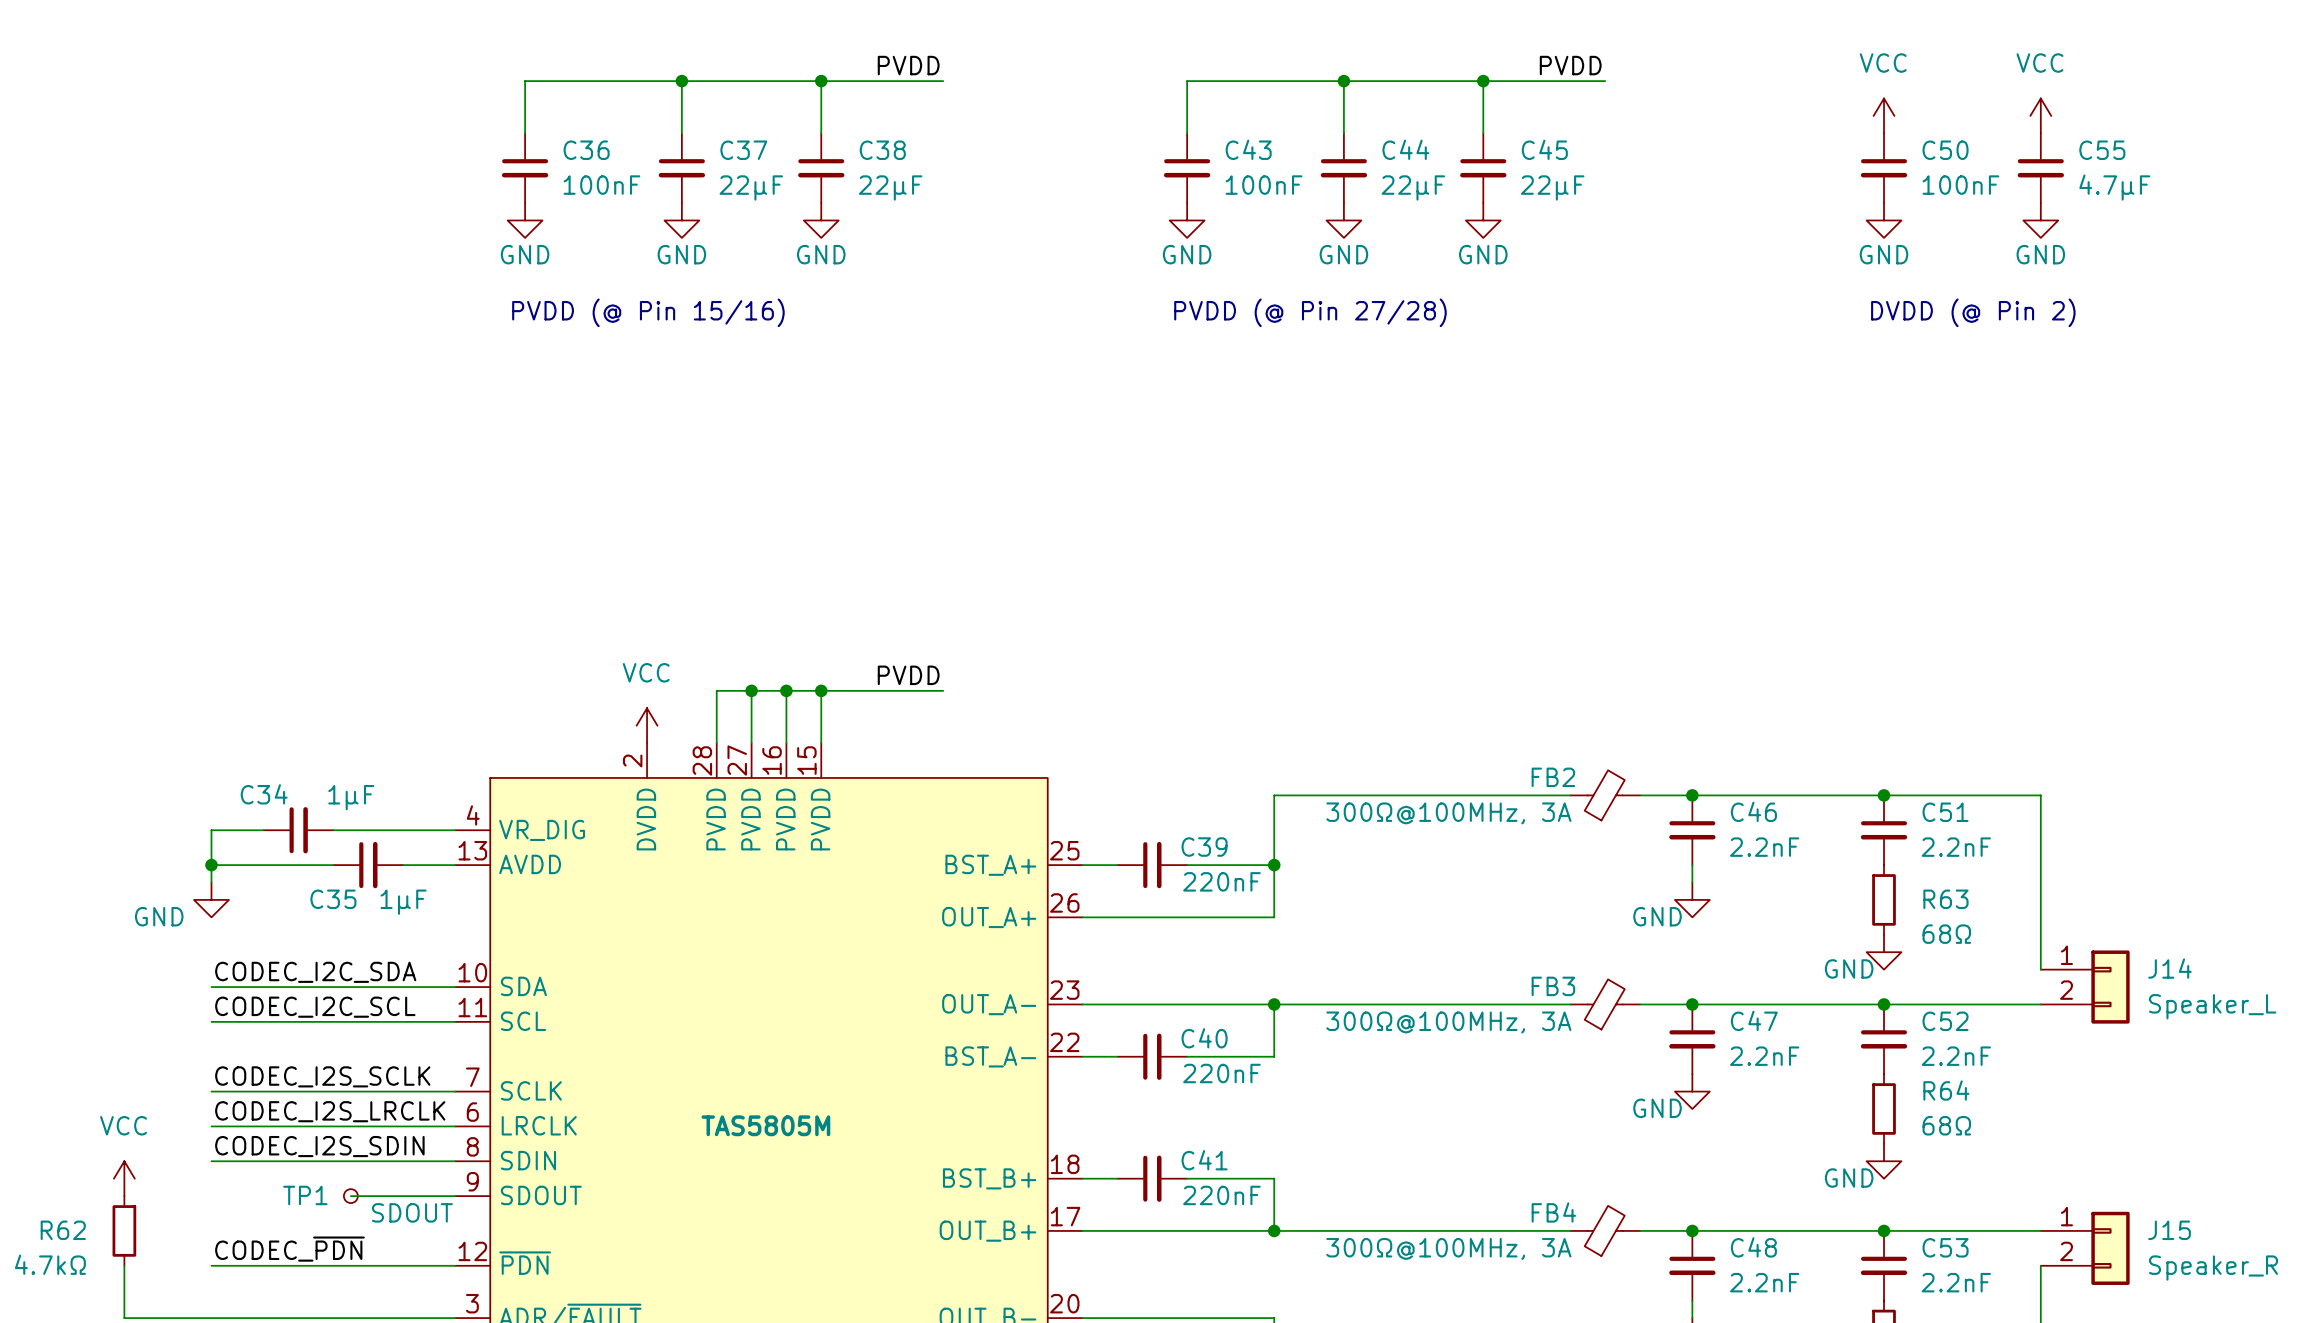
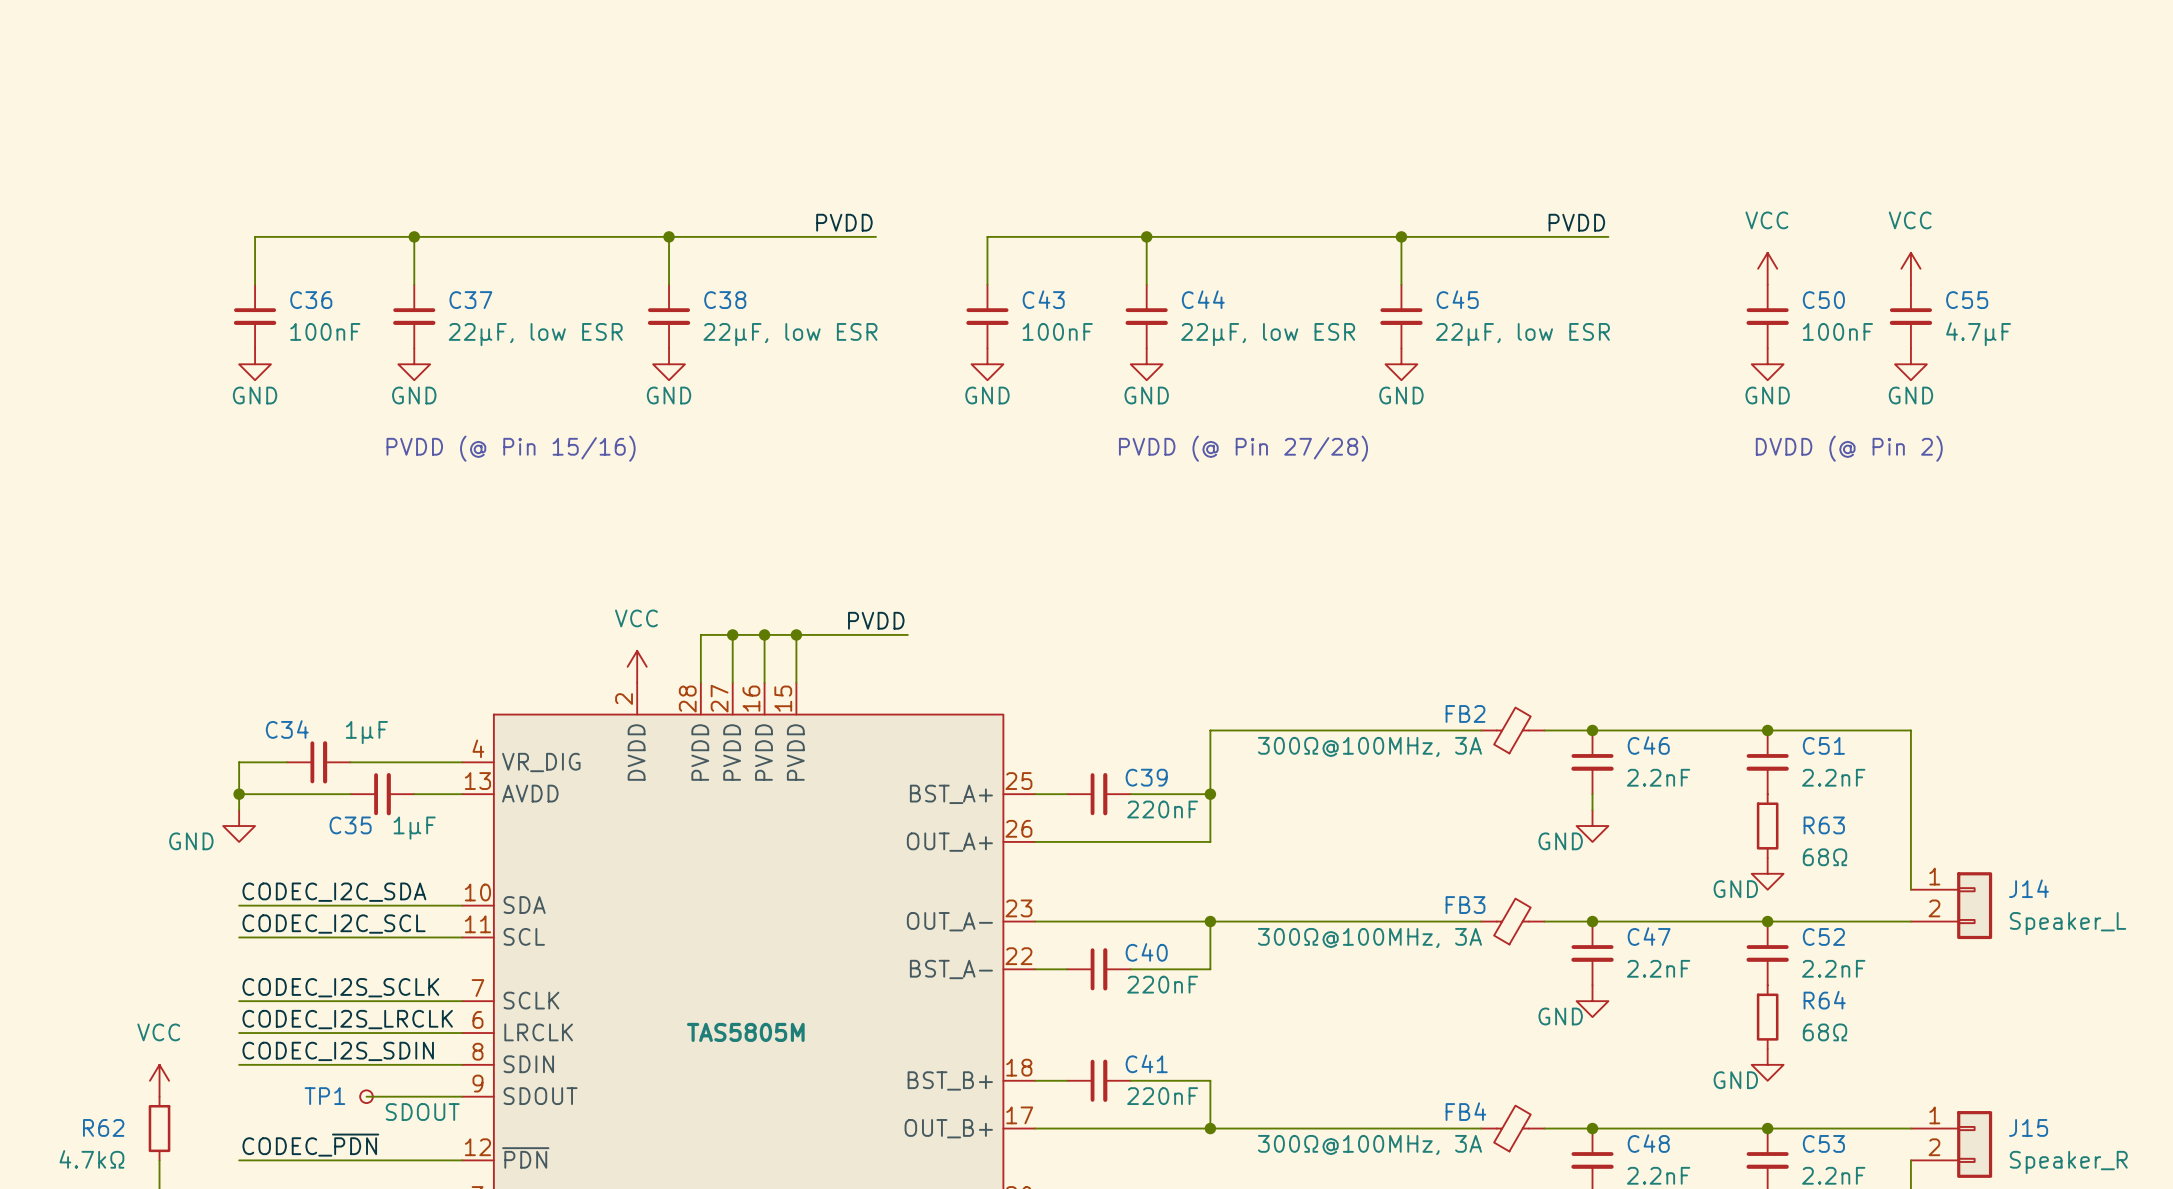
label position: PVDD (908, 65) -> PVDD (844, 222)
label position: PVDD (1570, 65) -> PVDD (1576, 222)
wire: (681, 81) (681, 133) -> (669, 236) (669, 284)
junction: (681, 81) -> none
wire: (821, 81) (821, 133) -> none
junction: (821, 81) -> none
wire: (943, 81) (525, 81) (525, 133) -> none
wire: (1343, 81) (1343, 133) -> (1146, 236) (1146, 284)
junction: (1343, 81) -> none
wire: (1483, 81) (1483, 133) -> (1401, 236) (1401, 284)
junction: (1483, 81) -> none
wire: (1605, 81) (1187, 81) (1187, 133) -> none
power symbol: VCC (1884, 115) -> none
power symbol: VCC (2040, 115) -> none
C36 position: (525, 168) -> (255, 316)
C37 position: (681, 168) -> (414, 316)
C38 position: (821, 168) -> (669, 316)
C43 position: (1187, 168) -> (987, 316)
C44 position: (1343, 168) -> (1146, 316)
C45 position: (1483, 168) -> (1401, 316)
C50 position: (1884, 168) -> (1767, 316)
C55 position: (2040, 168) -> (1910, 316)
C37 value: 22µF (751, 187) -> 22µF, low ESR (535, 334)
C38 value: 22µF (890, 187) -> 22µF, low ESR (790, 334)
C44 value: 22µF (1413, 187) -> 22µF, low ESR (1268, 334)
C45 value: 22µF (1552, 187) -> 22µF, low ESR (1522, 334)
power symbol: GND (525, 220) -> none
power symbol: GND (681, 220) -> none
power symbol: GND (821, 220) -> none
power symbol: GND (1187, 220) -> none
power symbol: GND (1343, 220) -> none
power symbol: GND (1483, 220) -> none
power symbol: GND (1884, 220) -> none
power symbol: GND (2040, 220) -> none
wire: none -> (414, 236) (414, 284)
junction: none -> (414, 236)
junction: none -> (669, 236)
wire: none -> (876, 236) (255, 236) (255, 284)
junction: none -> (1146, 236)
junction: none -> (1401, 236)
wire: none -> (1608, 236) (987, 236) (987, 284)
power symbol: none -> VCC (1767, 268)
power symbol: none -> VCC (1910, 268)
text position: PVDD (@ Pin 15/16) (648, 312) -> PVDD (@ Pin 15/16) (511, 448)
text position: PVDD (@ Pin 27/28) (1310, 312) -> PVDD (@ Pin 27/28) (1243, 448)
text position: DVDD (@ Pin 2) (1973, 312) -> DVDD (@ Pin 2) (1849, 448)
power symbol: none -> GND (255, 364)
power symbol: none -> GND (414, 364)
power symbol: none -> GND (669, 364)
power symbol: none -> GND (987, 364)
power symbol: none -> GND (1146, 364)
power symbol: none -> GND (1401, 364)
power symbol: none -> GND (1767, 364)
power symbol: none -> GND (1910, 364)

